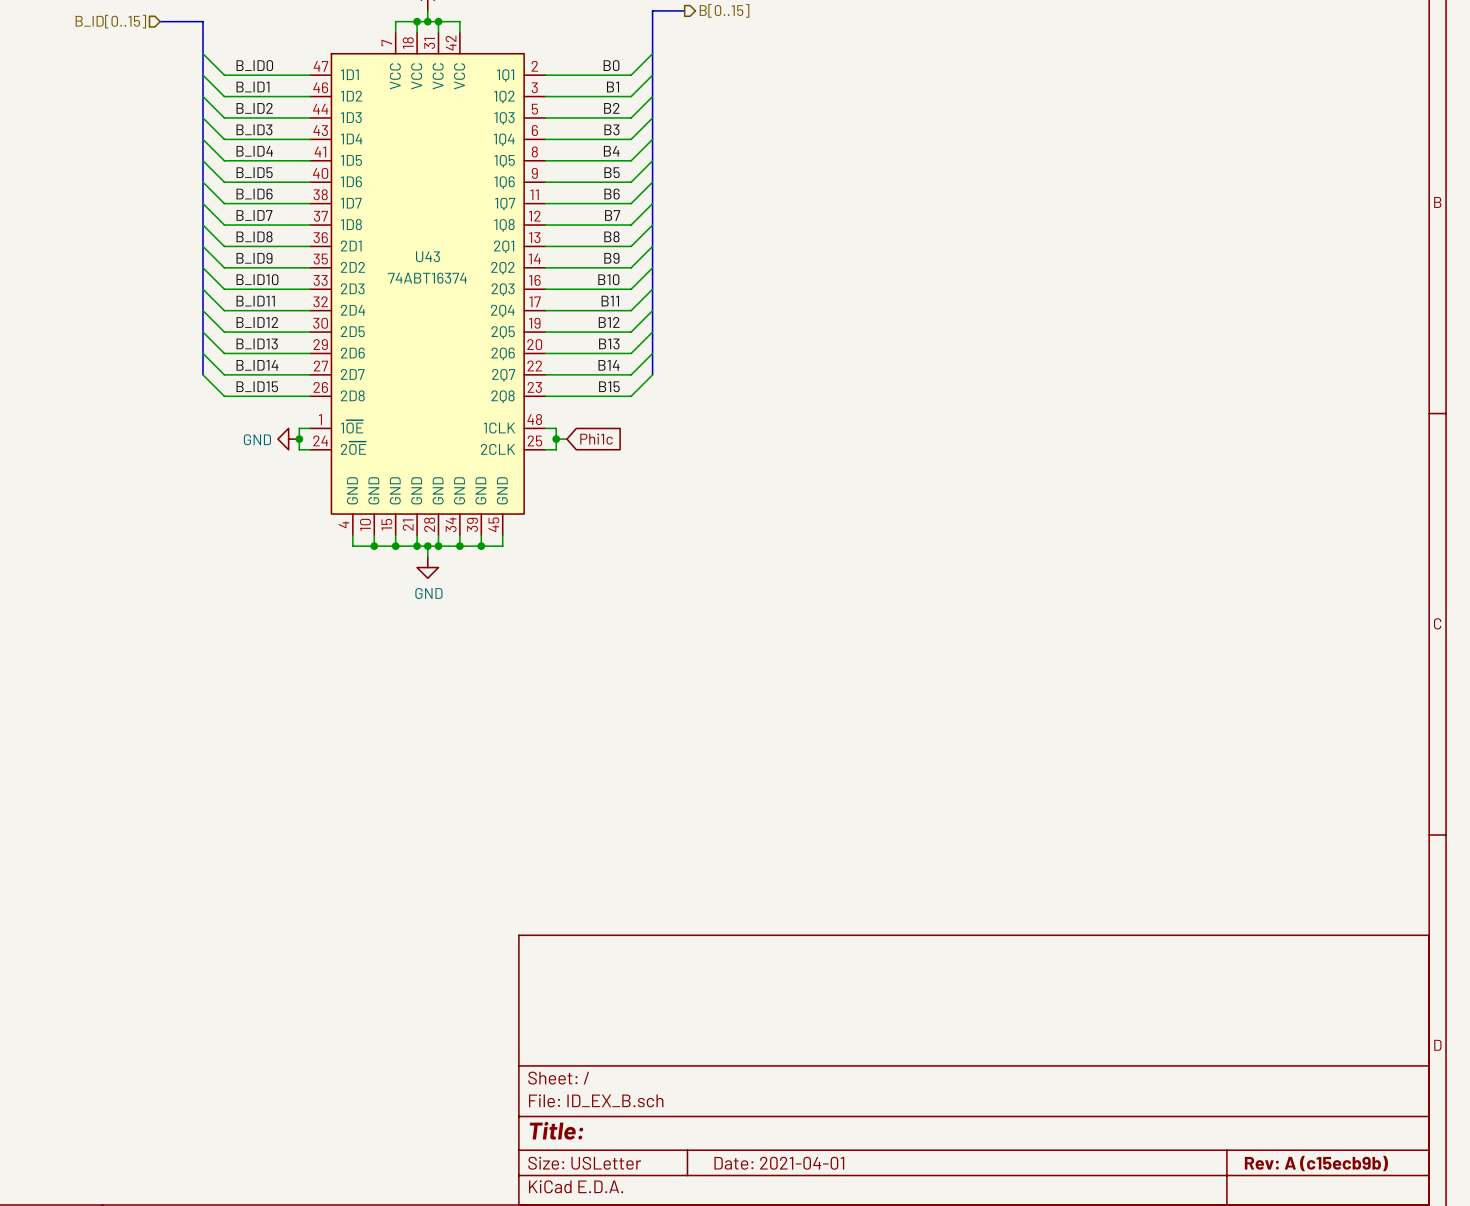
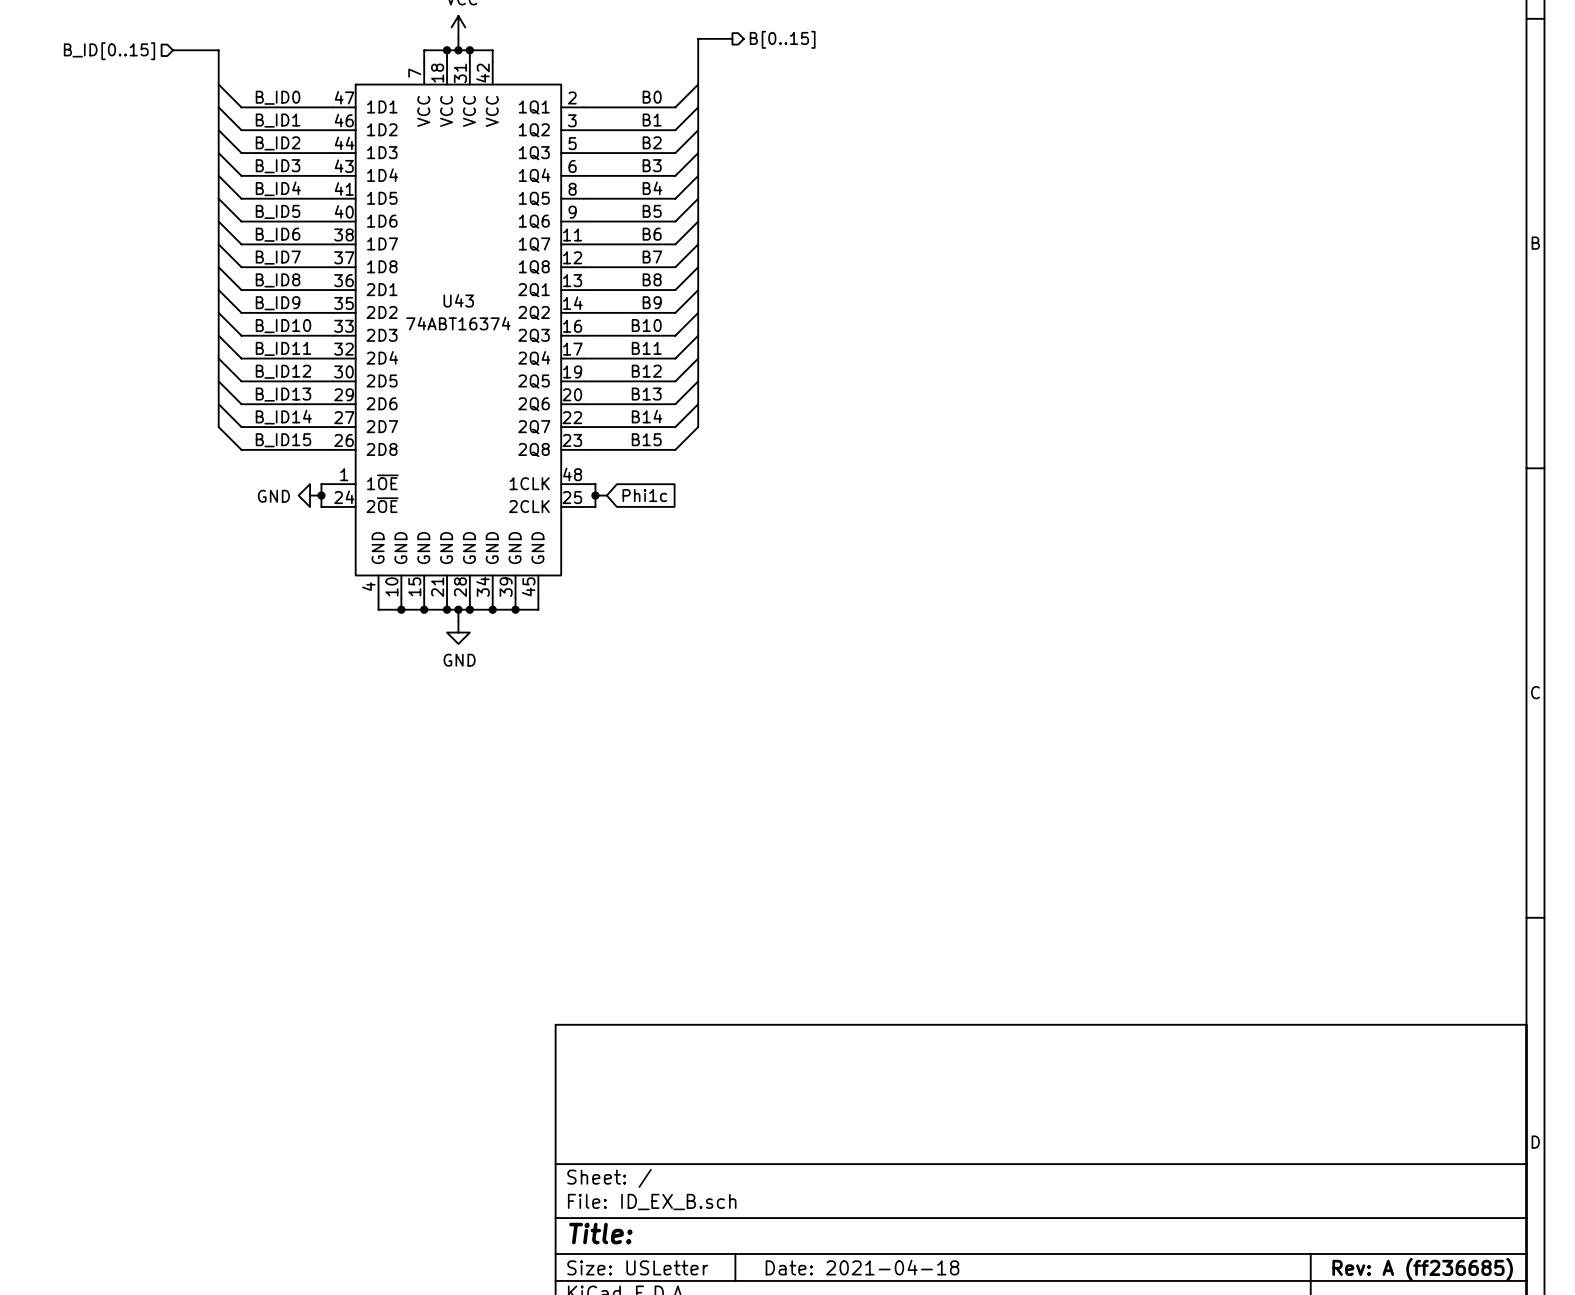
title block: Date: 2021-04-01 (779, 1163) -> Date: 2021-04-18 (862, 1267)
title block: Rev: A (c15ecb9b) (1316, 1163) -> Rev: A (ff236685) (1422, 1269)

